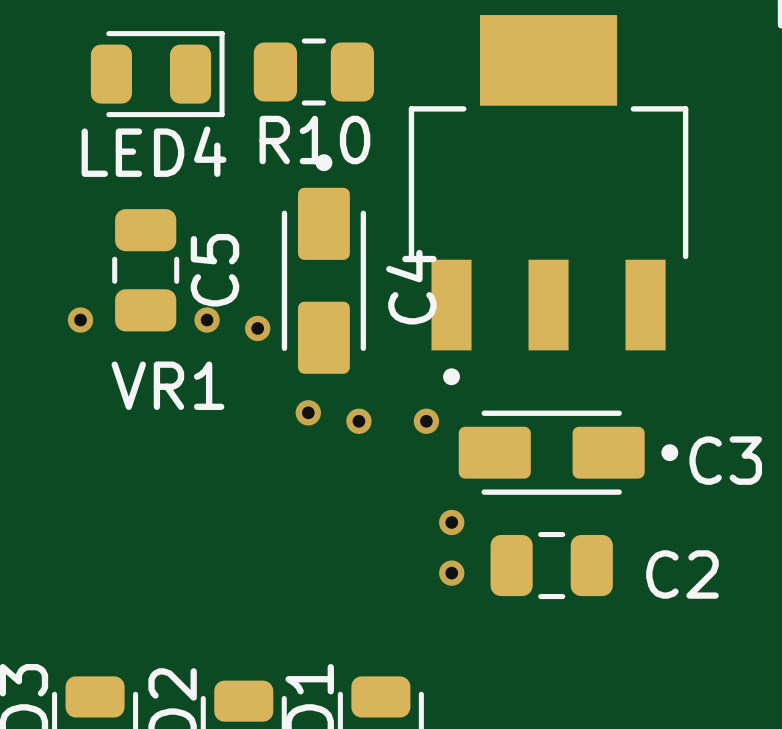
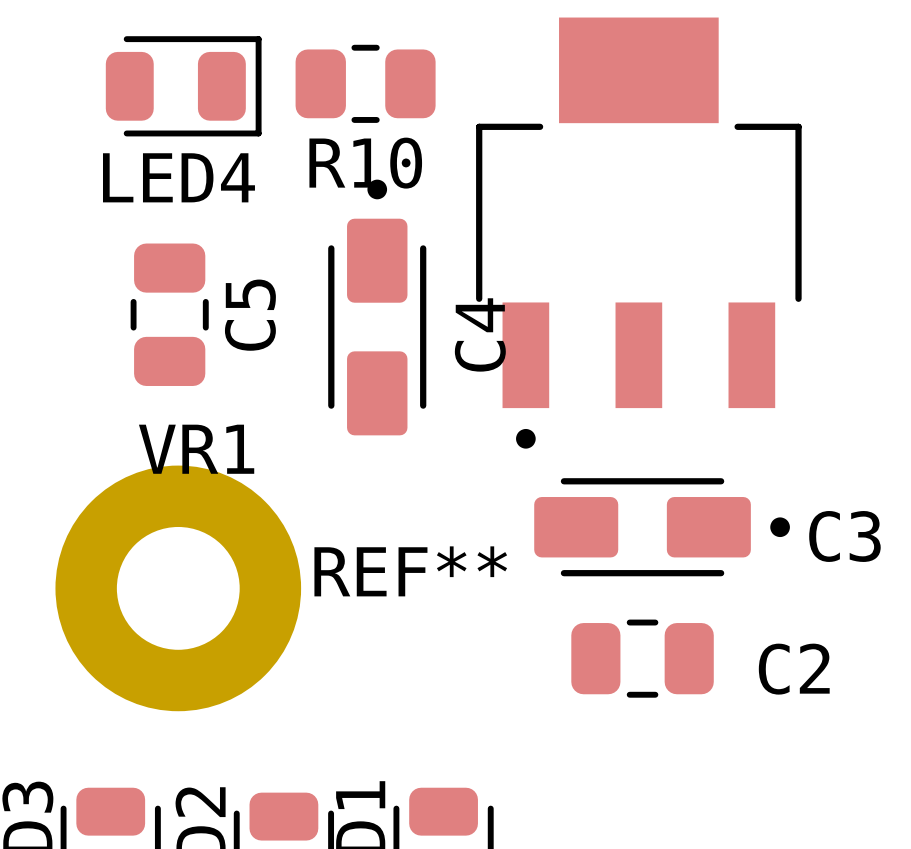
via: (80, 320) -> none
via: (207, 320) -> none
via: (257, 328) -> none
via: (308, 412) -> none
via: (358, 421) -> none
via: (426, 421) -> none
REF**: none -> (178, 588)
via: (451, 522) -> none
via: (451, 573) -> none

